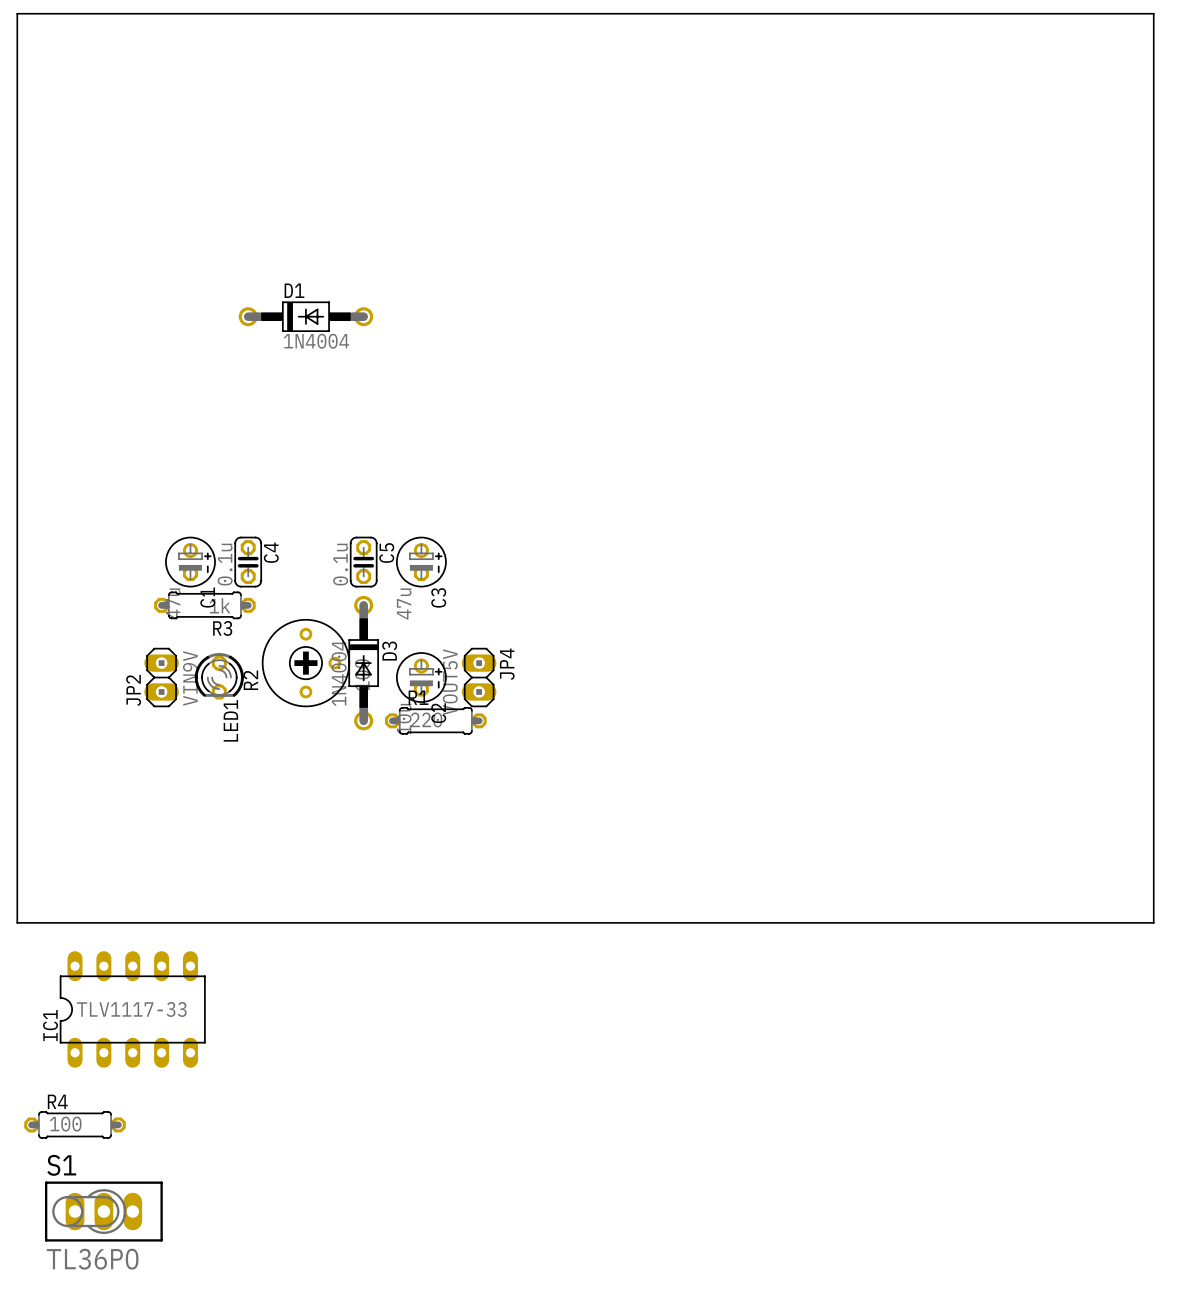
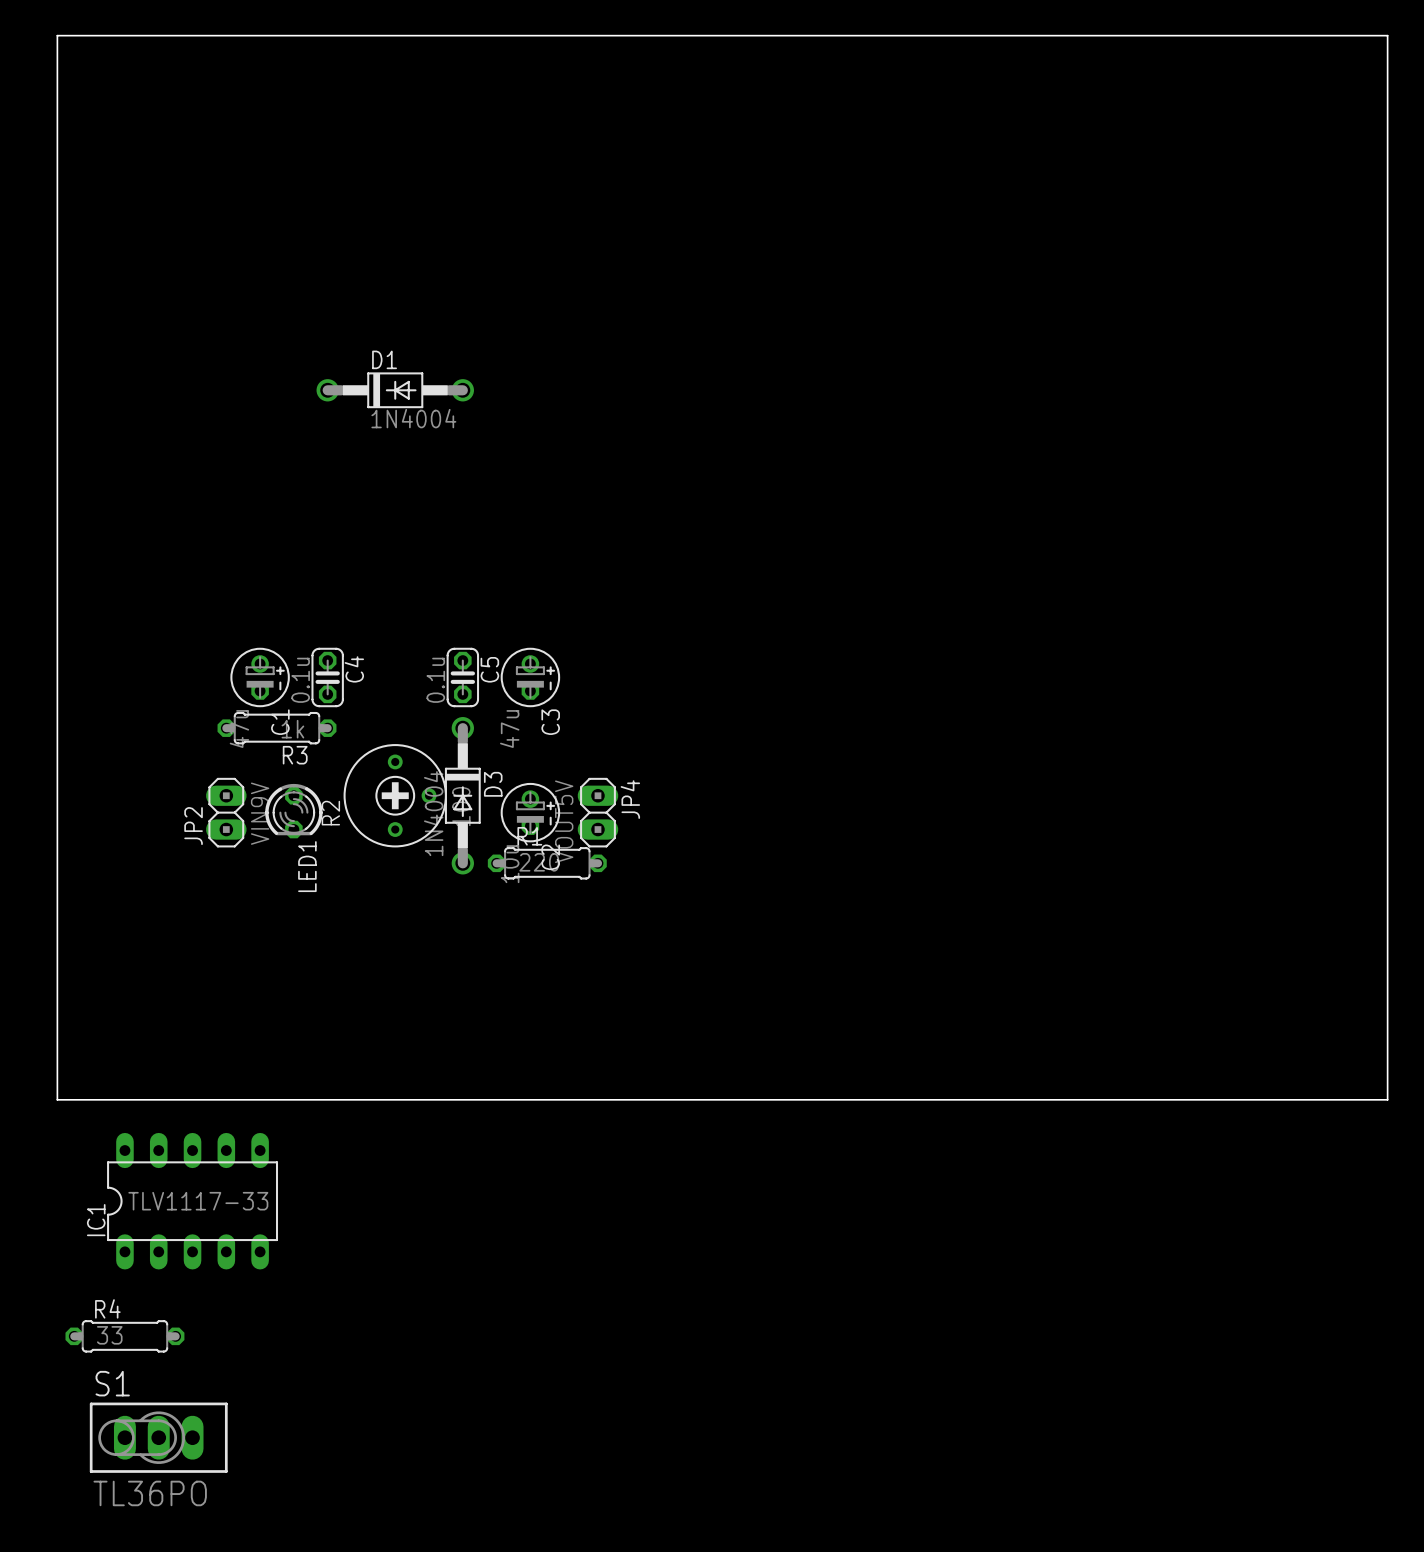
R4 value: 100 (65, 1124) -> 33 (109, 1335)

